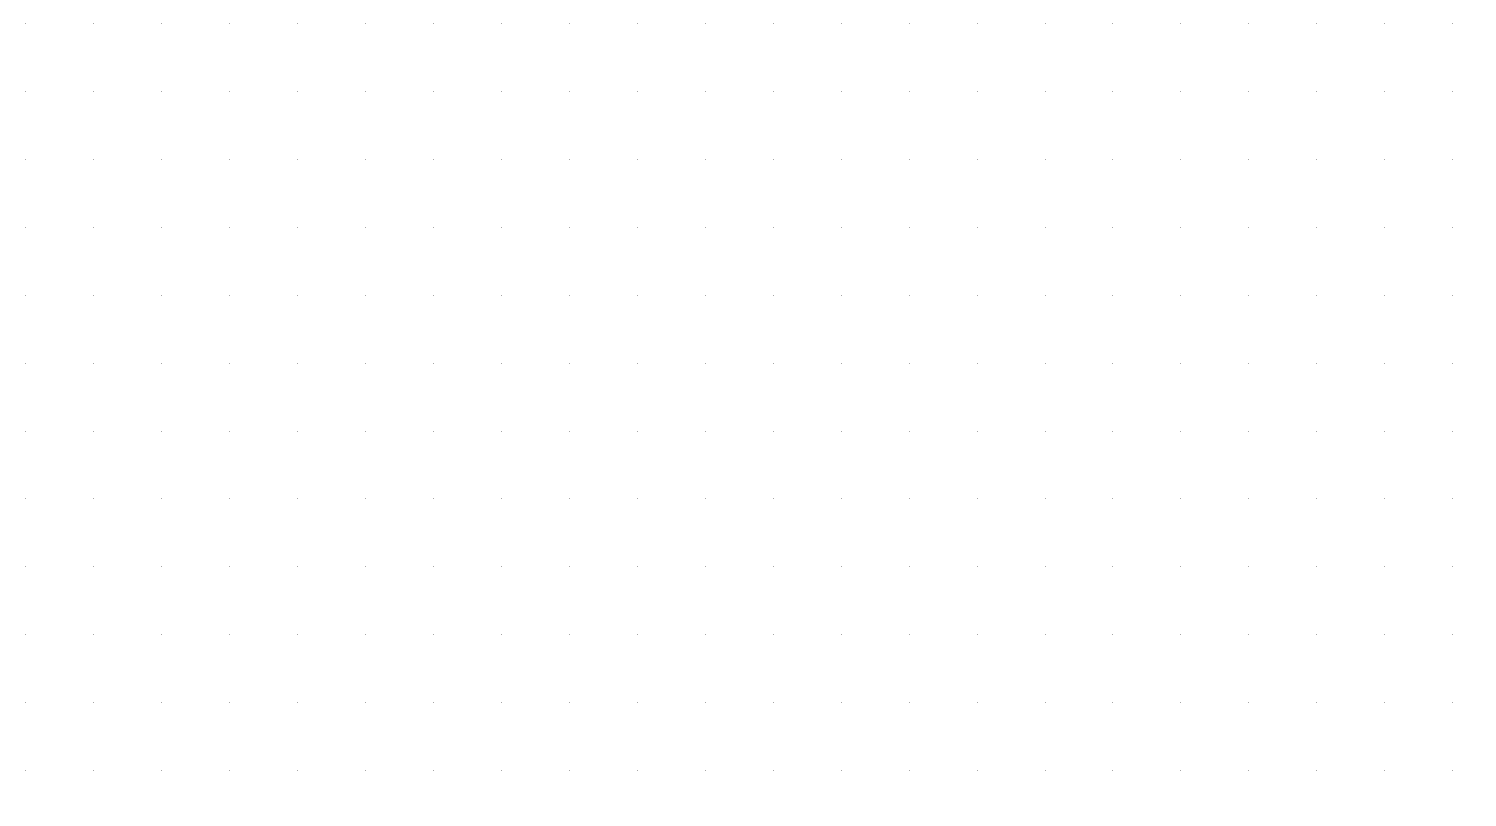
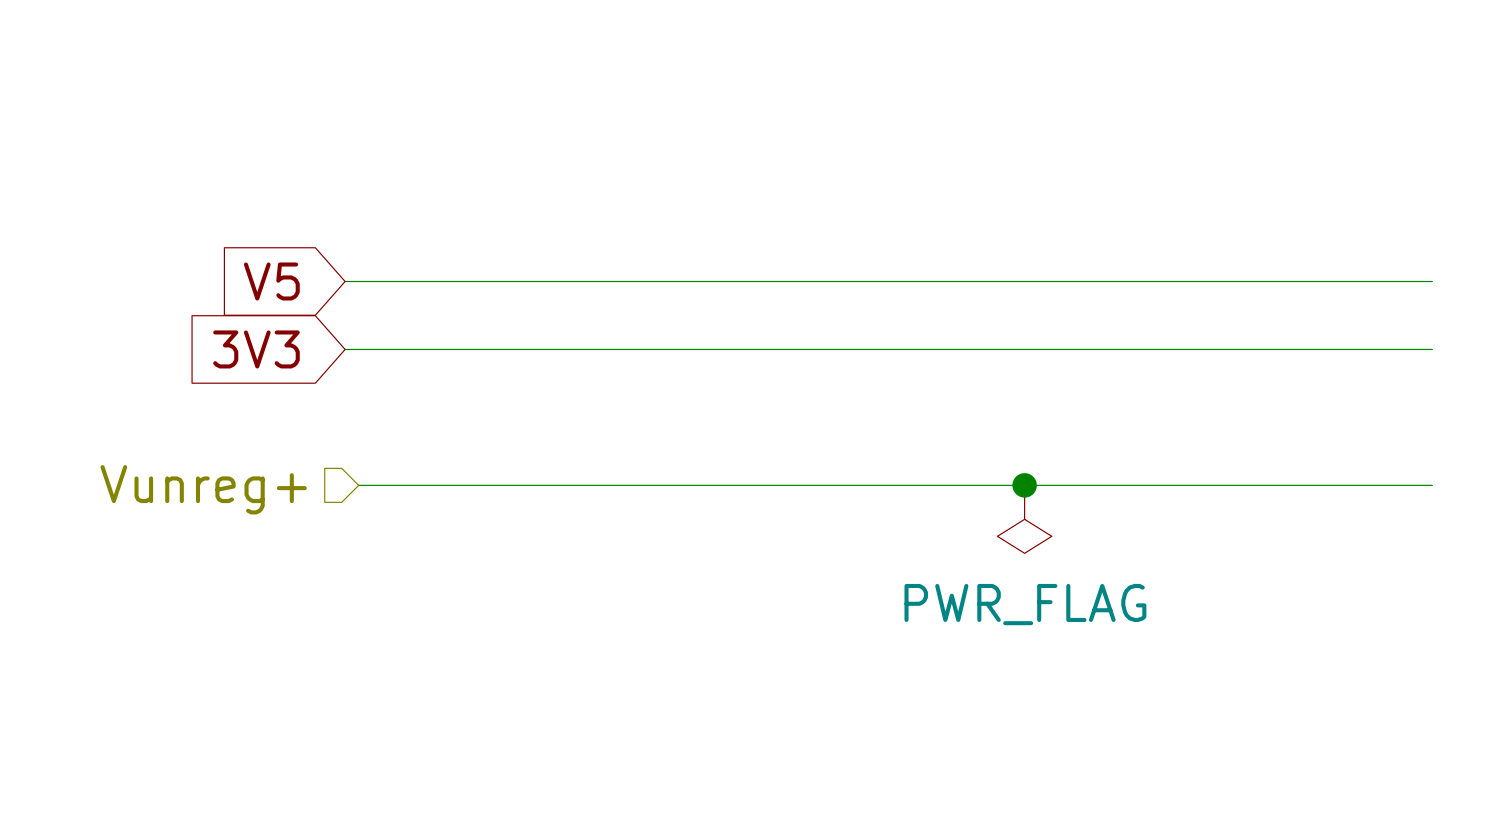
global label: none -> V5 (271, 281)
wire: none -> (345, 281) (1432, 281)
global label: none -> 3V3 (256, 349)
wire: none -> (345, 349) (1432, 349)
wire: none -> (358, 485) (1432, 485)
junction: none -> (1024, 485)
hierarchical label: none -> Vunreg+ (203, 489)
power symbol: none -> PWR_FLAG (1024, 519)

